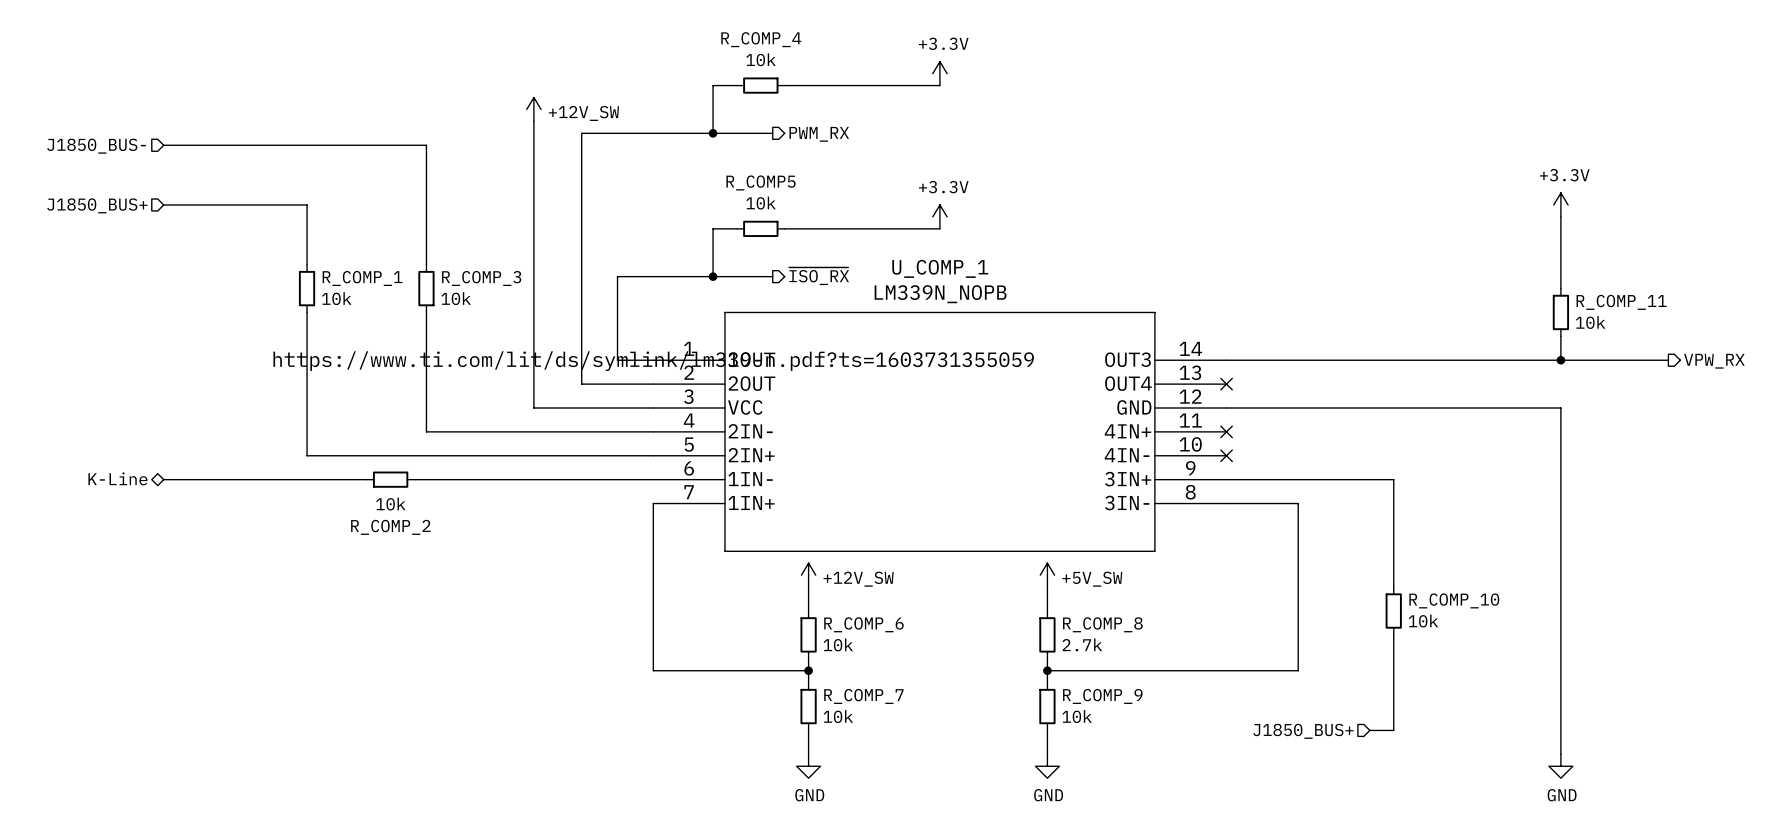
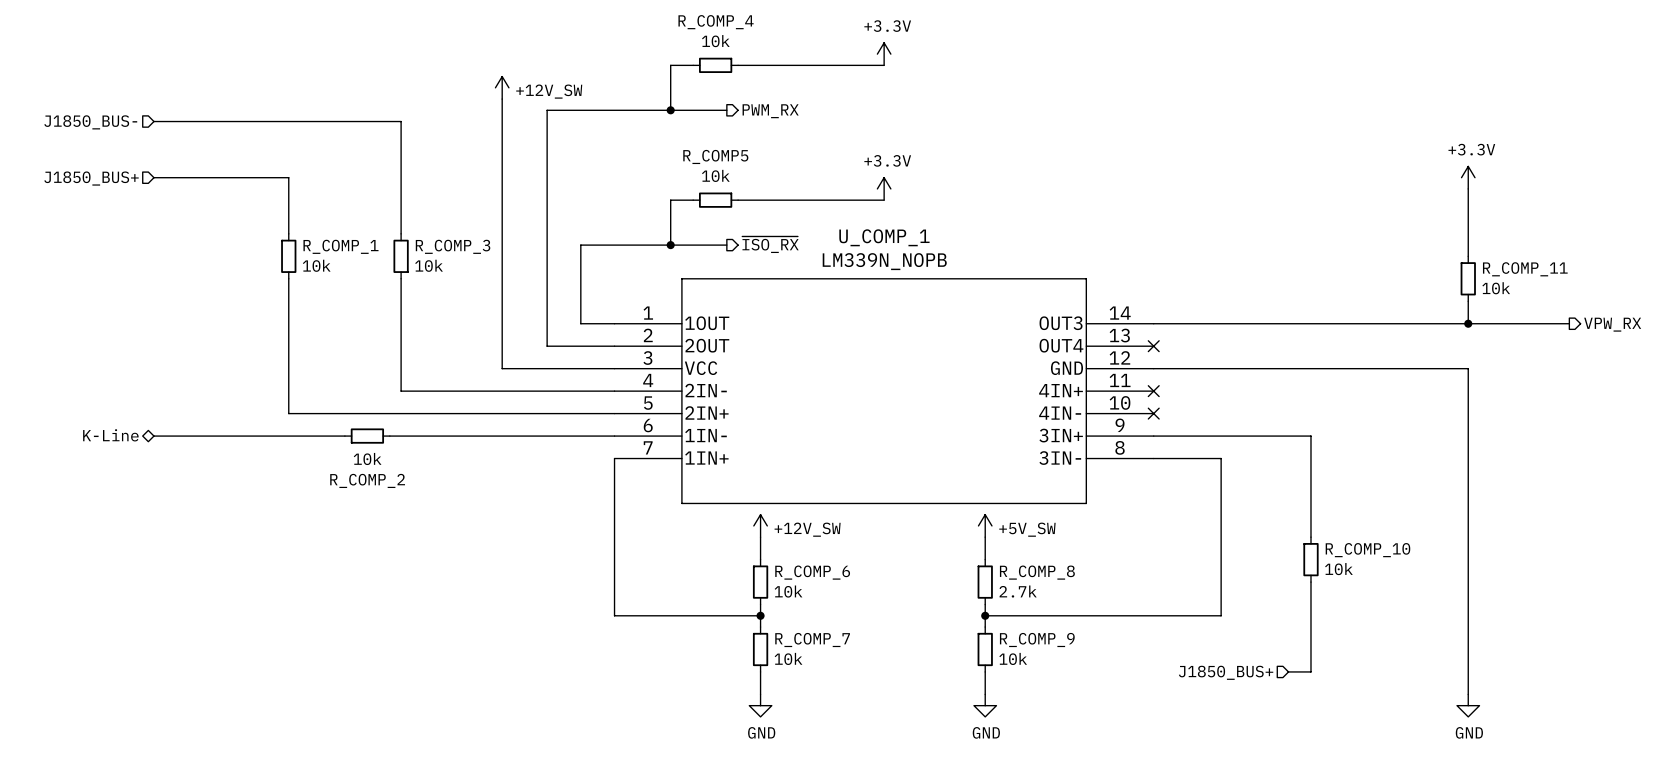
U_COMP_1 text: https://www.ti.com/lit/ds/symlink/lm339-n.pdf?ts=1603731355059 (653, 361) -> none

